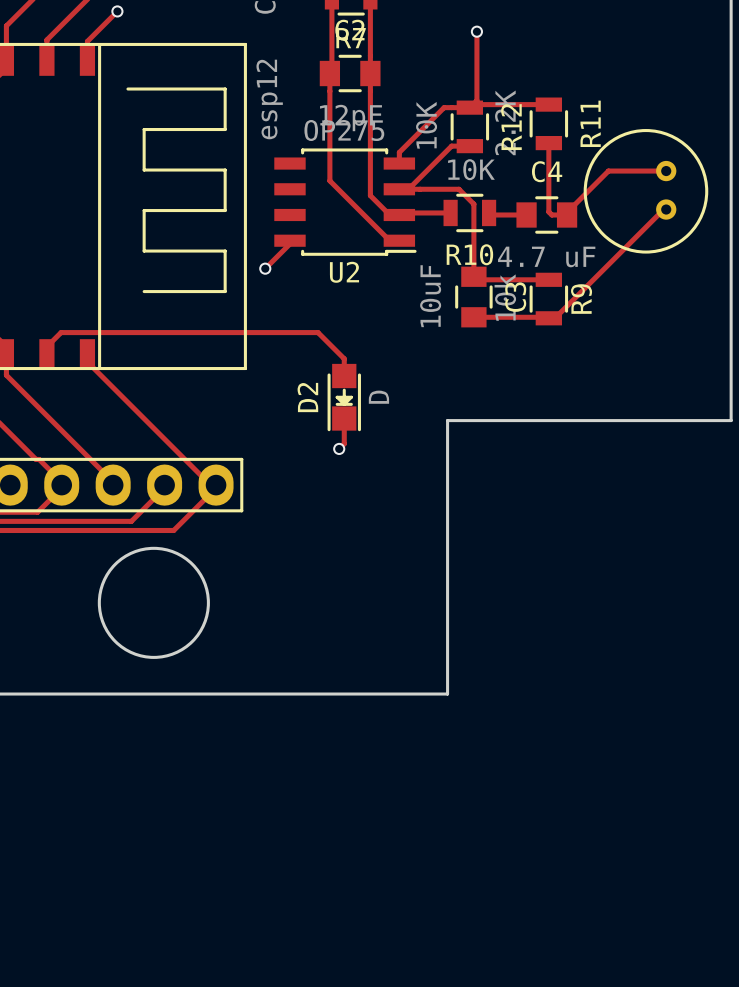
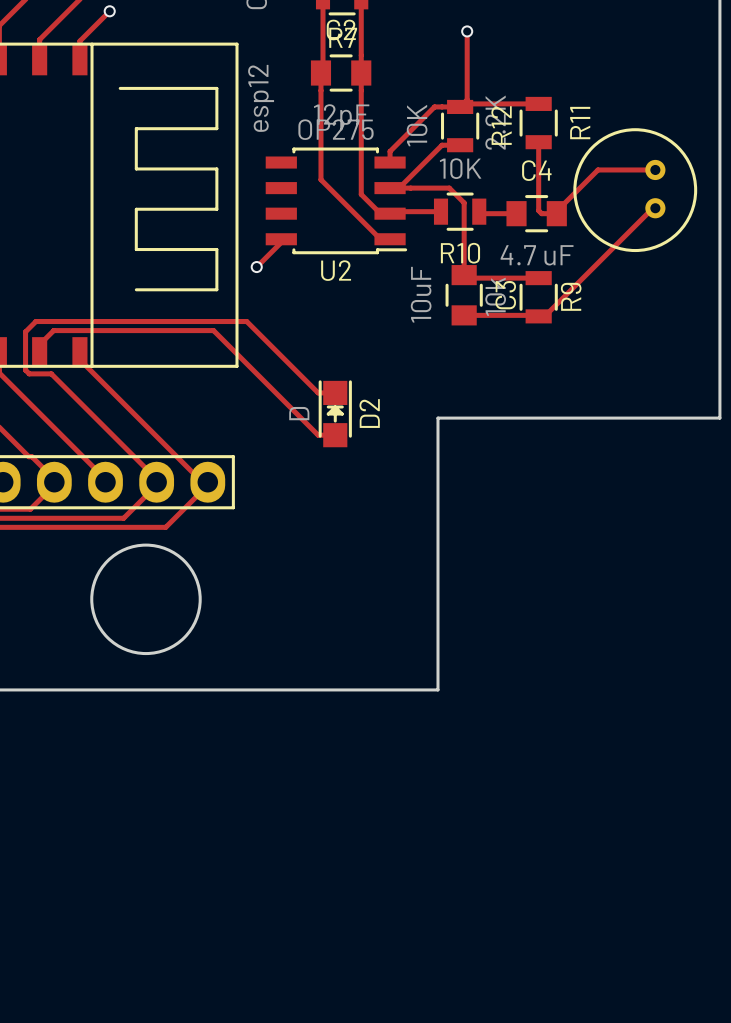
track: (221, 332) (318, 332) (344, 358) (344, 376) -> (213, 330) (318, 435) (335, 435)
track: none -> (335, 392) (318, 392) (246, 321) (35, 321) (25, 331) (25, 370) (29, 373) (51, 373) (156, 479)
D2 rotation: 0° (344, 397) -> 180° (335, 413)
track: (344, 418) (344, 443) (339, 448) -> none
via: (339, 448) -> none

